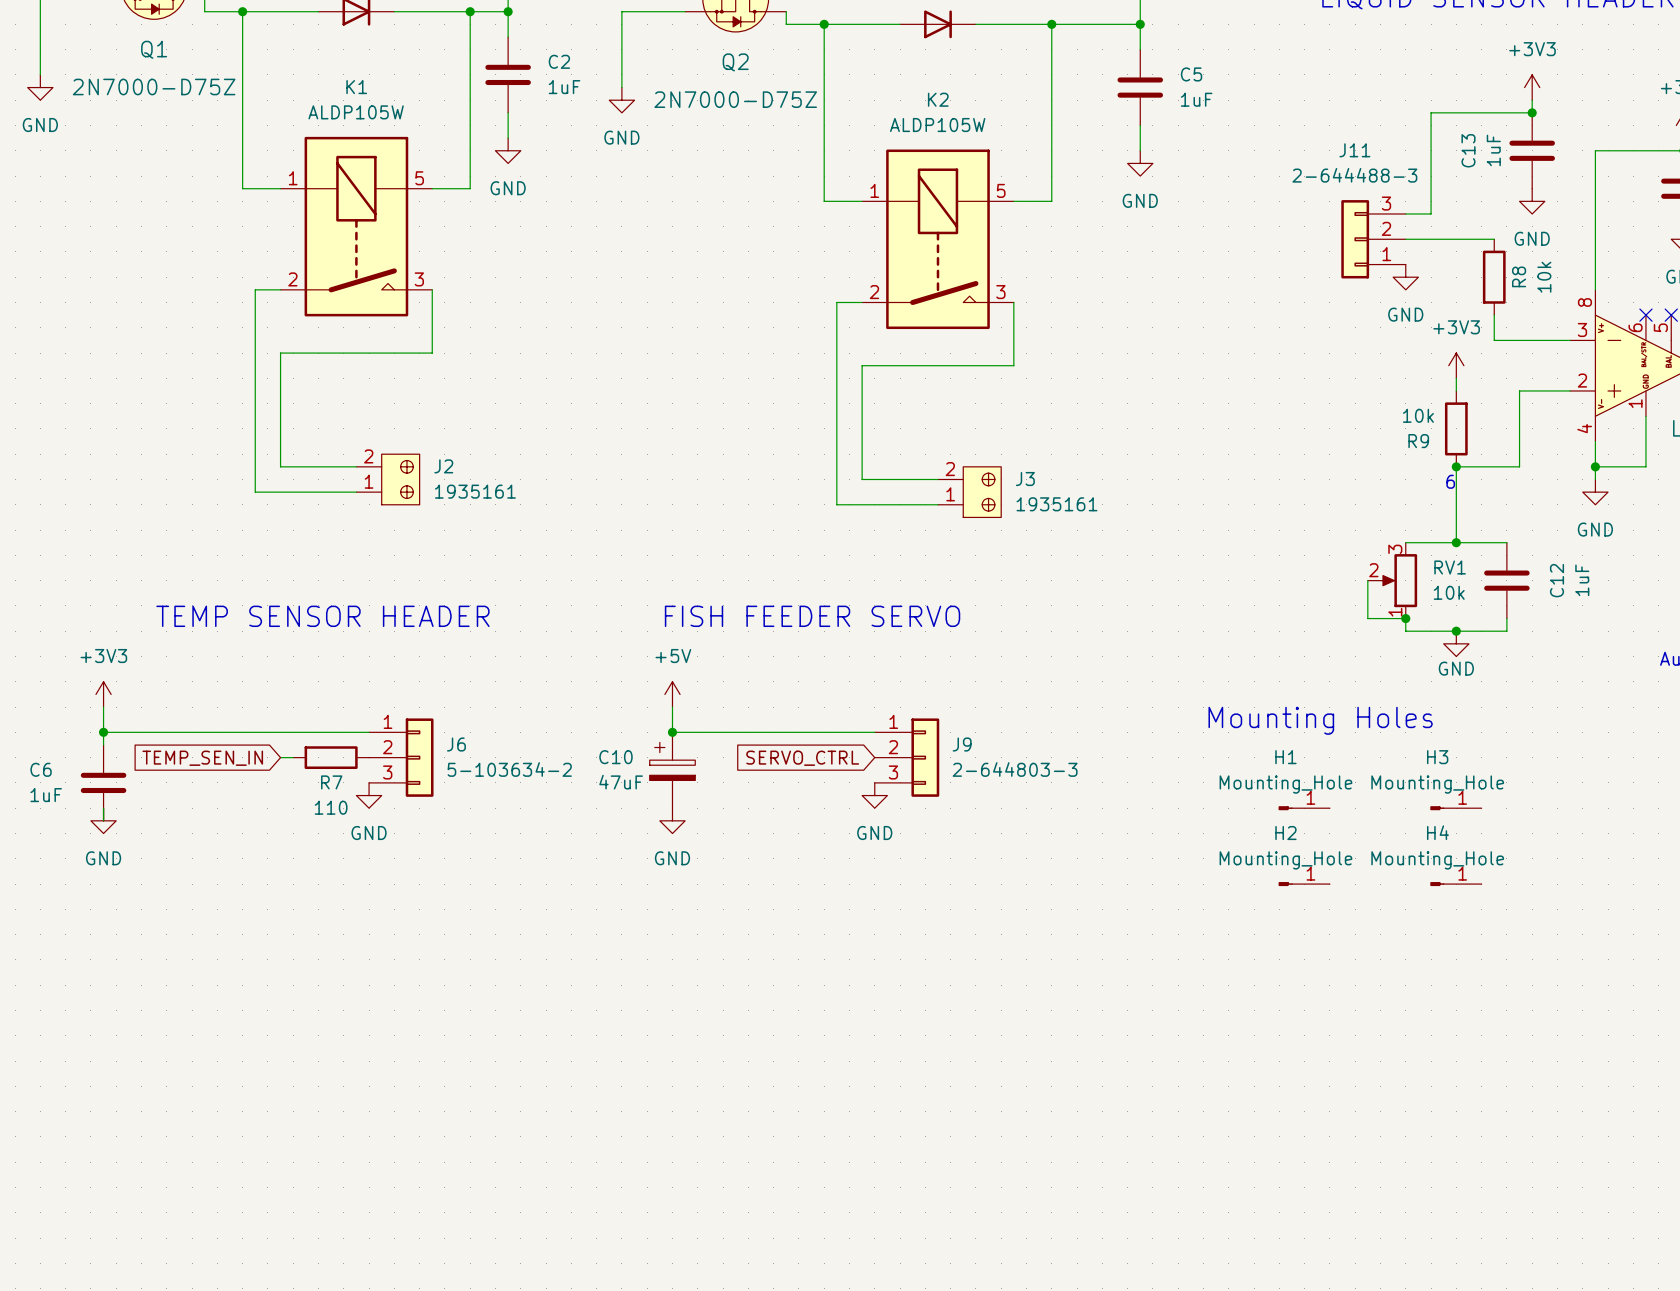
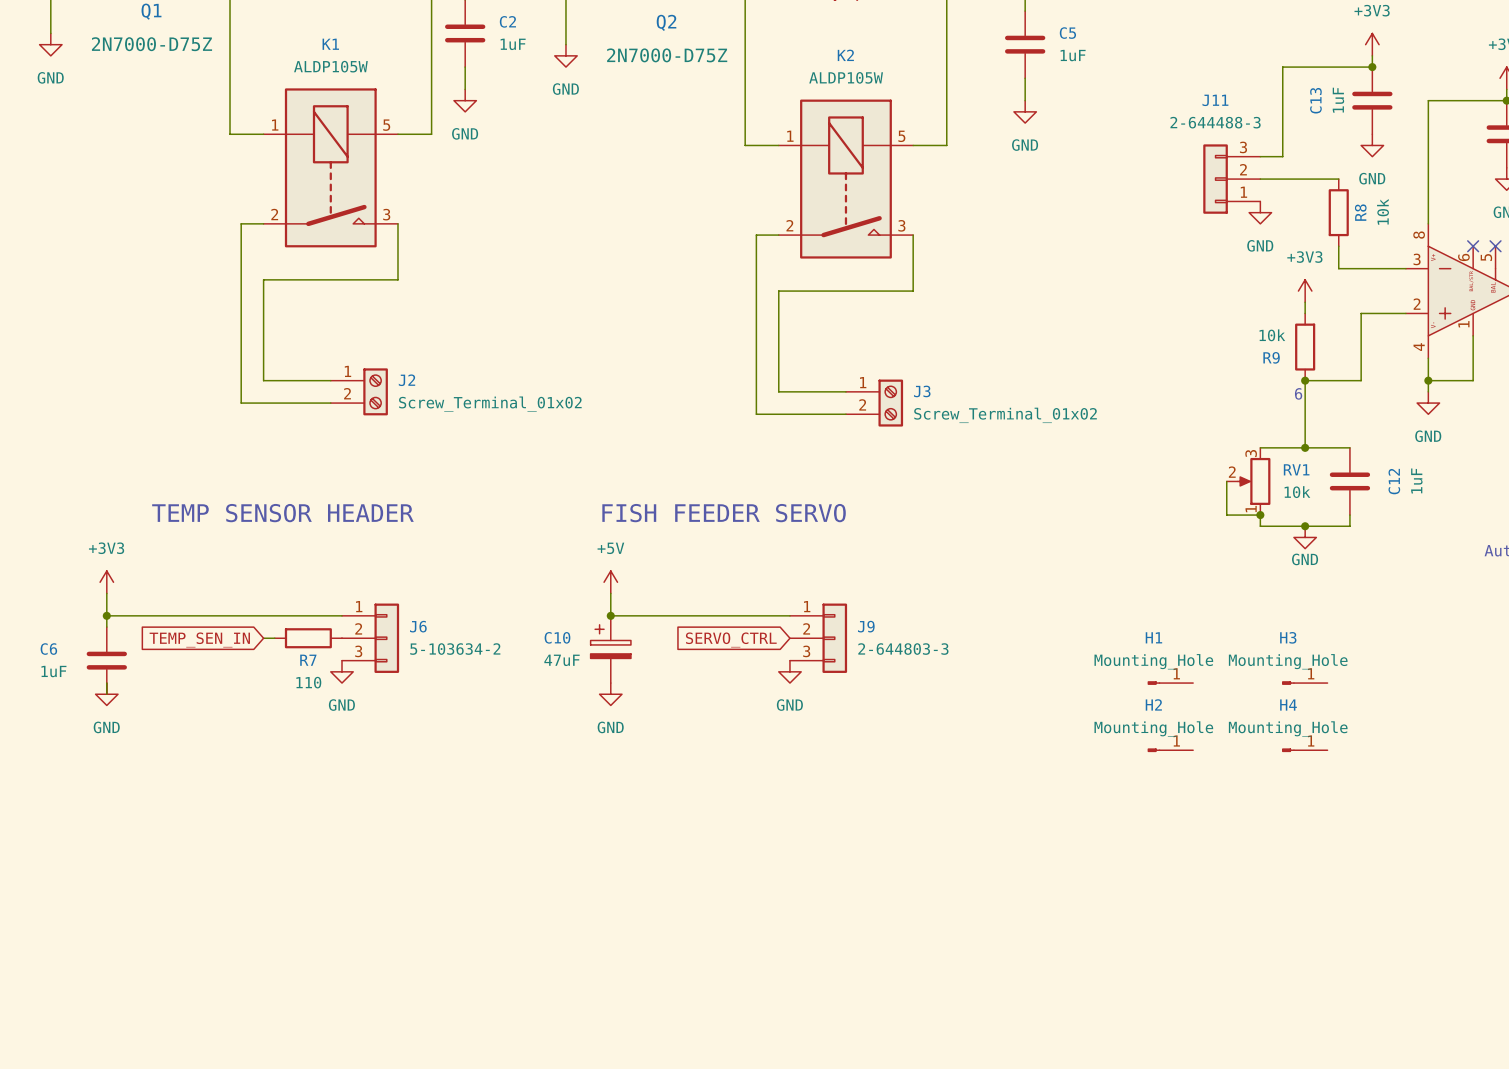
J2 symbol: [356, 454, 420, 505] -> [330, 368, 388, 416]
J3 symbol: [937, 466, 1002, 518] -> [845, 379, 904, 427]
J2 value: 1935161 (475, 491) -> Screw_Terminal_01x02 (490, 404)
J3 value: 1935161 (1056, 504) -> Screw_Terminal_01x02 (1005, 415)
text: Mounting Holes (1320, 720) -> none

